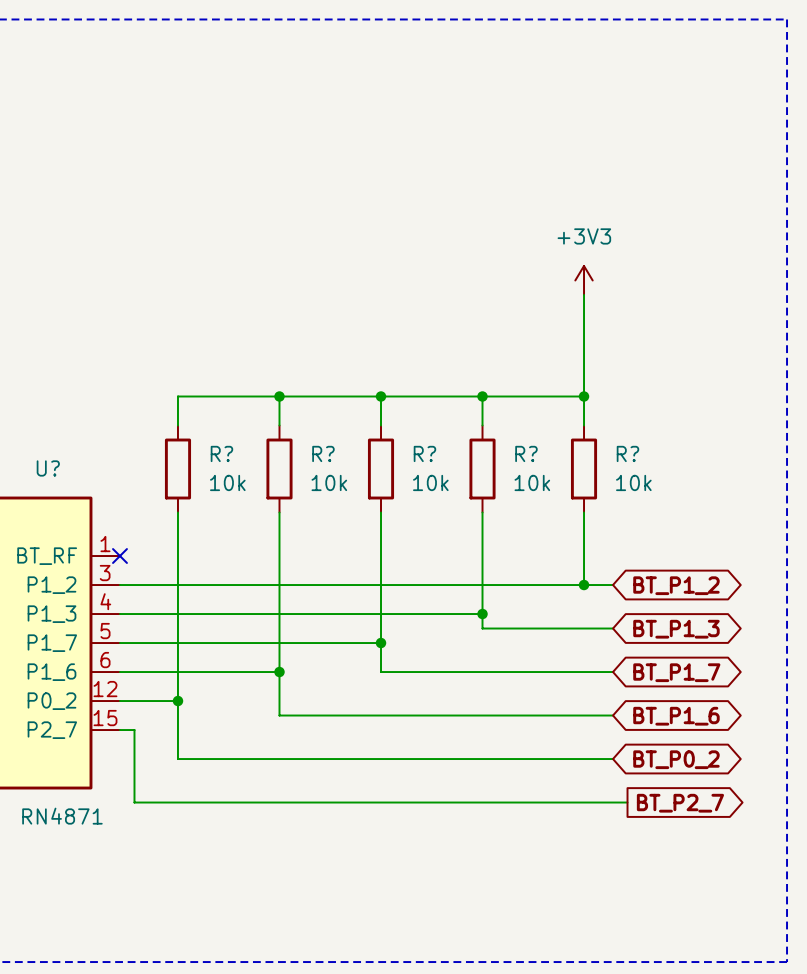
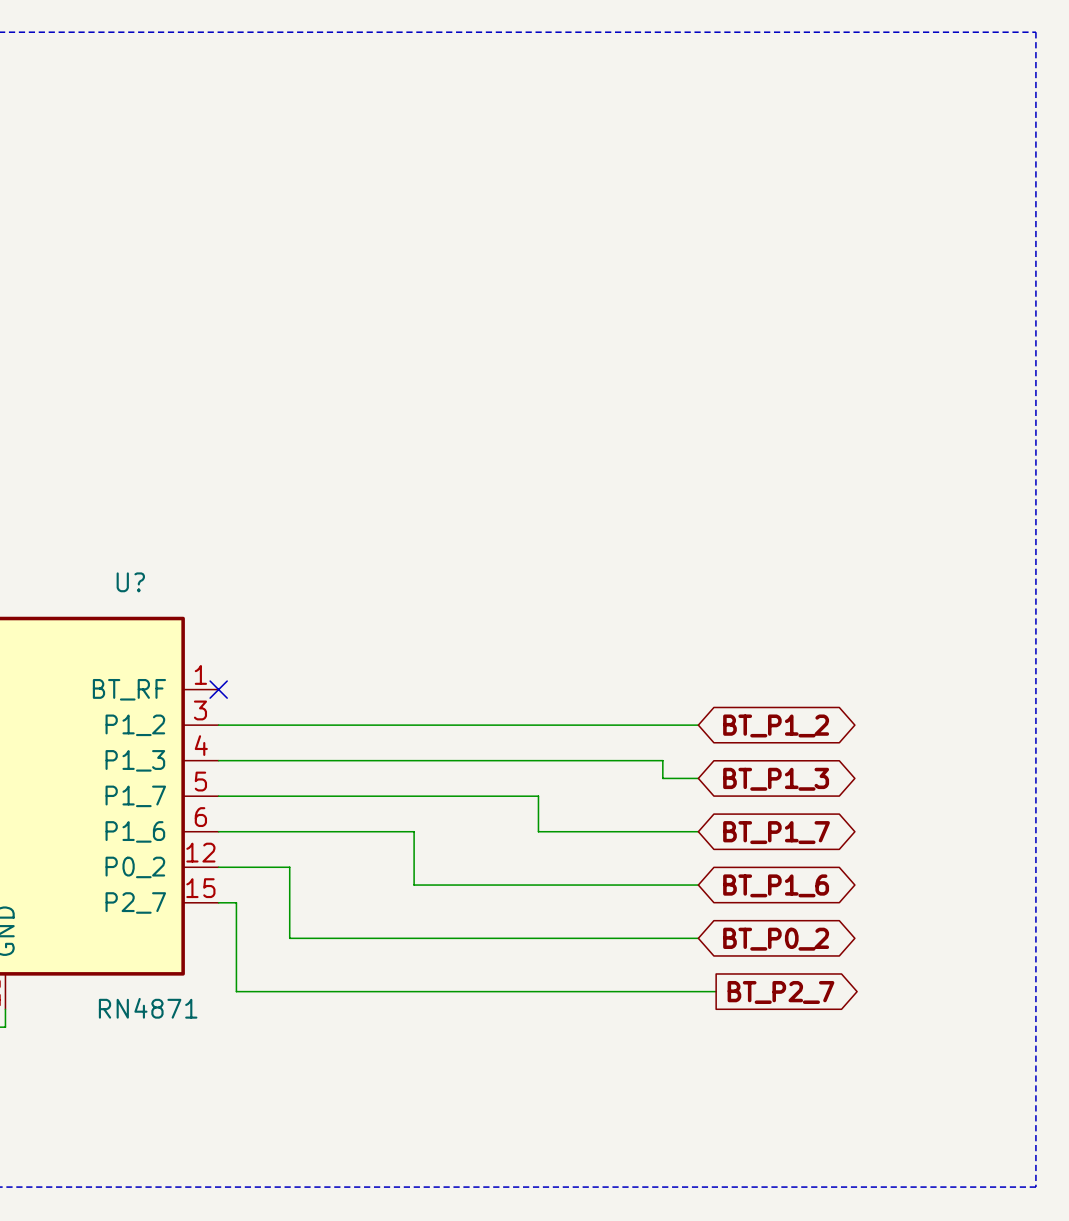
power symbol: +3V3 (584, 280) -> none
wire: (584, 294) (584, 425) -> none
wire: (279, 396) (279, 425) -> none
junction: (279, 396) -> none
wire: (381, 396) (381, 425) -> none
junction: (381, 396) -> none
wire: (482, 396) (482, 425) -> none
junction: (482, 396) -> none
wire: (584, 396) (177, 396) (177, 425) -> none
junction: (584, 396) -> none
R?: 10k (177, 469) -> none
R?: 10k (279, 469) -> none
R?: 10k (381, 469) -> none
R?: 10k (482, 469) -> none
R?: 10k (584, 469) -> none
wire: (177, 512) (177, 701) -> none
wire: (279, 512) (279, 672) -> none
wire: (381, 512) (381, 643) -> none
wire: (482, 512) (482, 614) -> none
wire: (584, 512) (584, 585) -> none
wire: (511, 585) (613, 585) -> none
junction: (584, 585) -> none
global label position: BT_P1_2 (676, 585) -> BT_P1_2 (776, 725)
junction: (482, 614) -> none
wire: (511, 628) (613, 628) -> none
global label position: BT_P1_3 (676, 629) -> BT_P1_3 (776, 779)
junction: (381, 643) -> none
junction: (279, 672) -> none
wire: (511, 672) (613, 672) -> none
global label position: BT_P1_7 (676, 672) -> BT_P1_7 (776, 832)
junction: (177, 701) -> none
wire: (511, 715) (613, 715) -> none
global label position: BT_P1_6 (676, 716) -> BT_P1_6 (776, 885)
wire: (511, 759) (613, 759) -> none
global label position: BT_P0_2 (676, 759) -> BT_P0_2 (776, 939)
wire: (526, 802) (627, 802) -> none
global label position: BT_P2_7 (680, 803) -> BT_P2_7 (780, 992)

